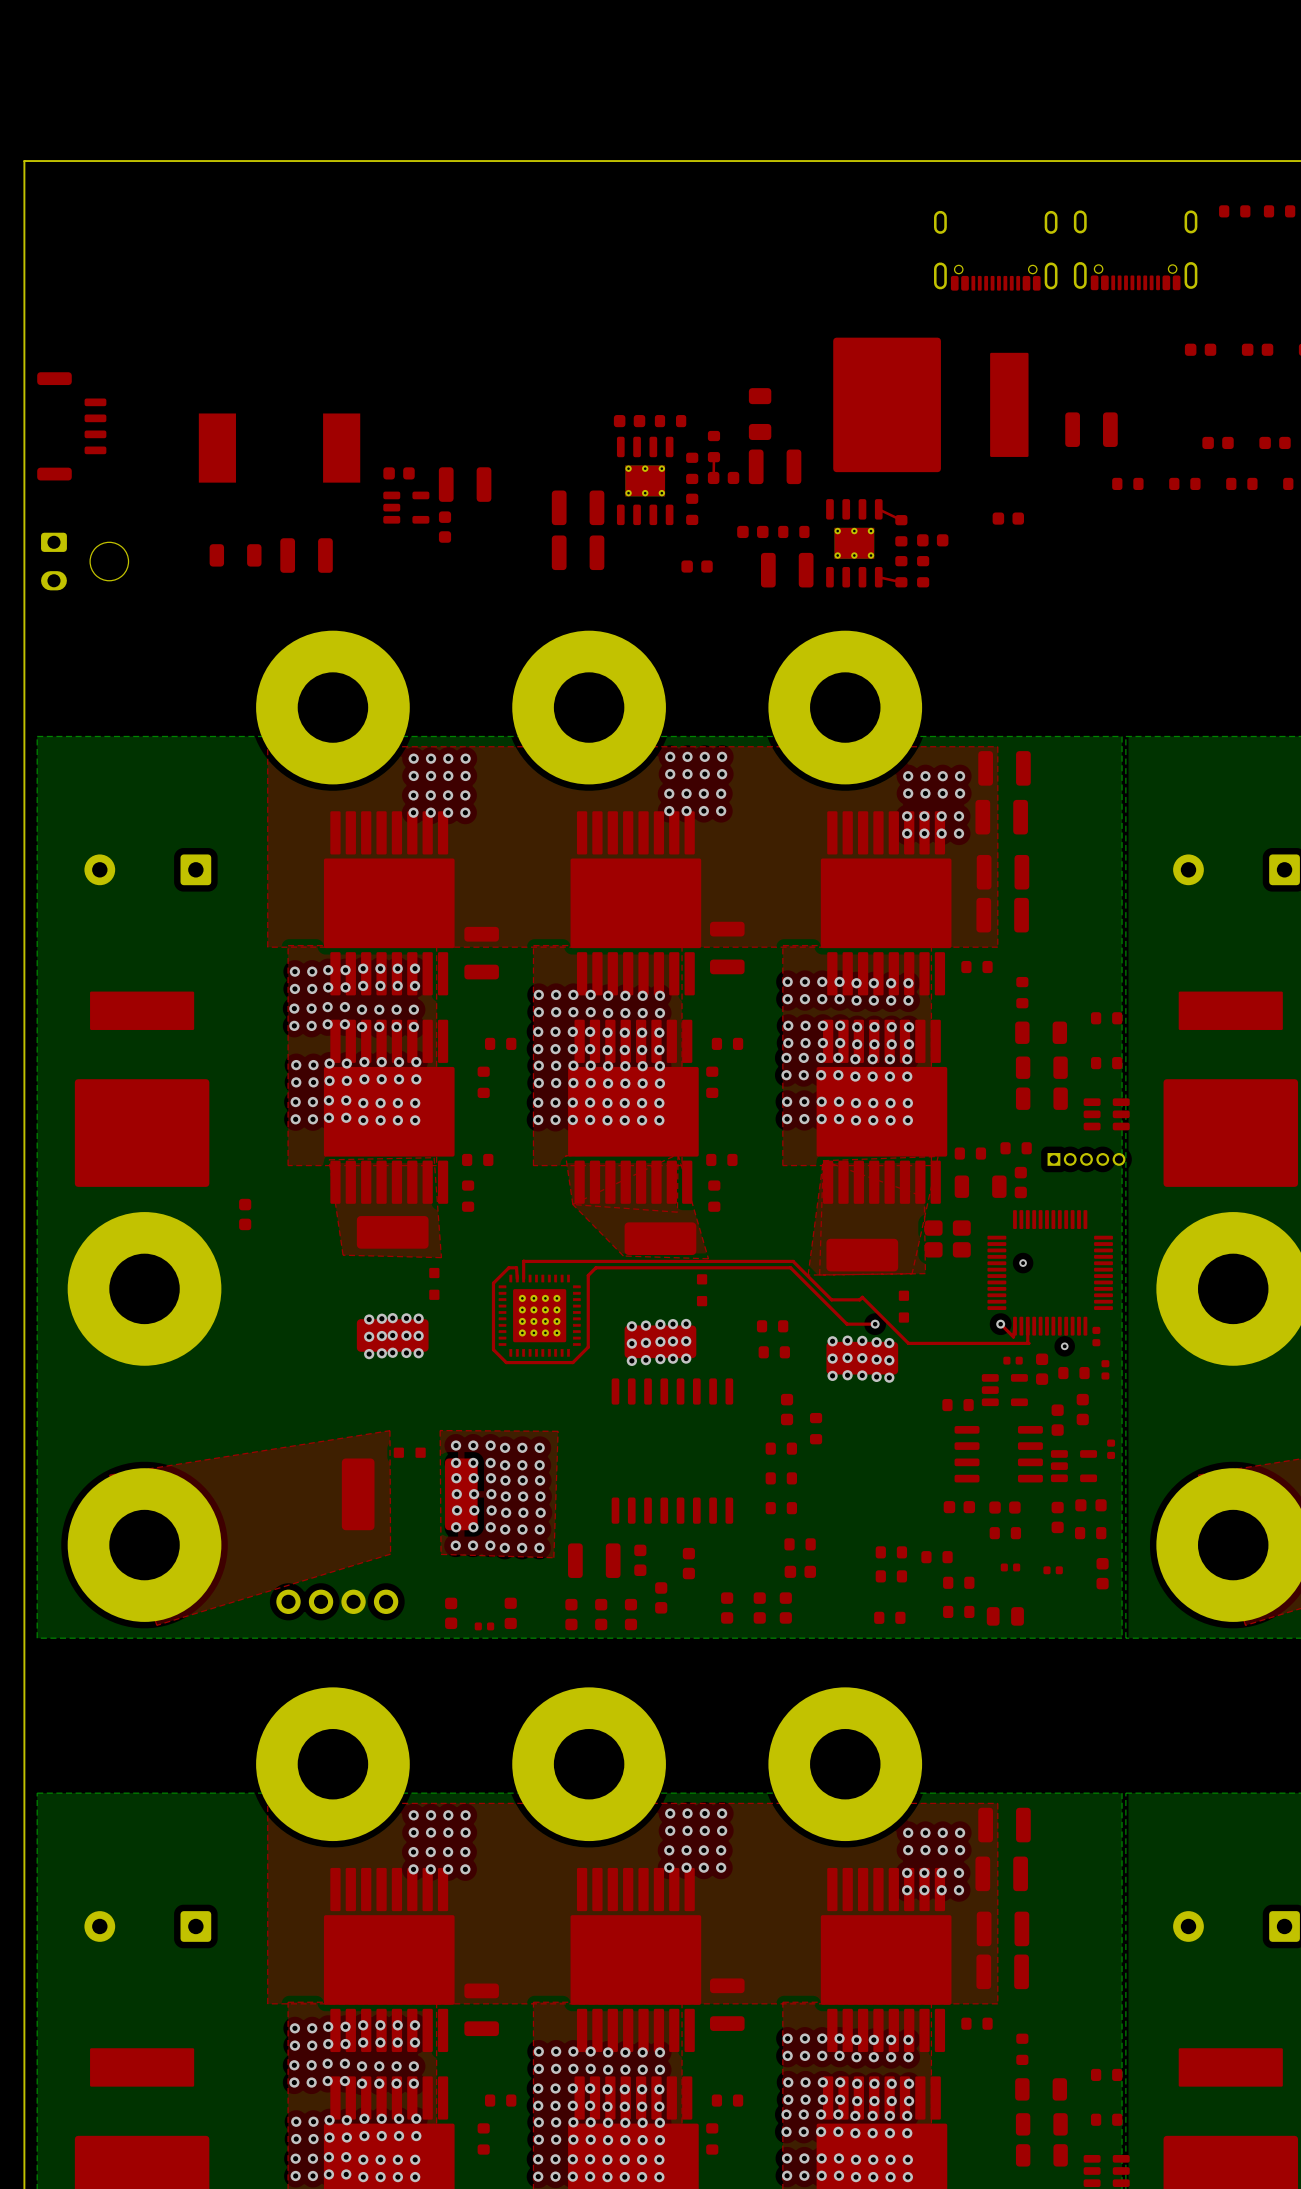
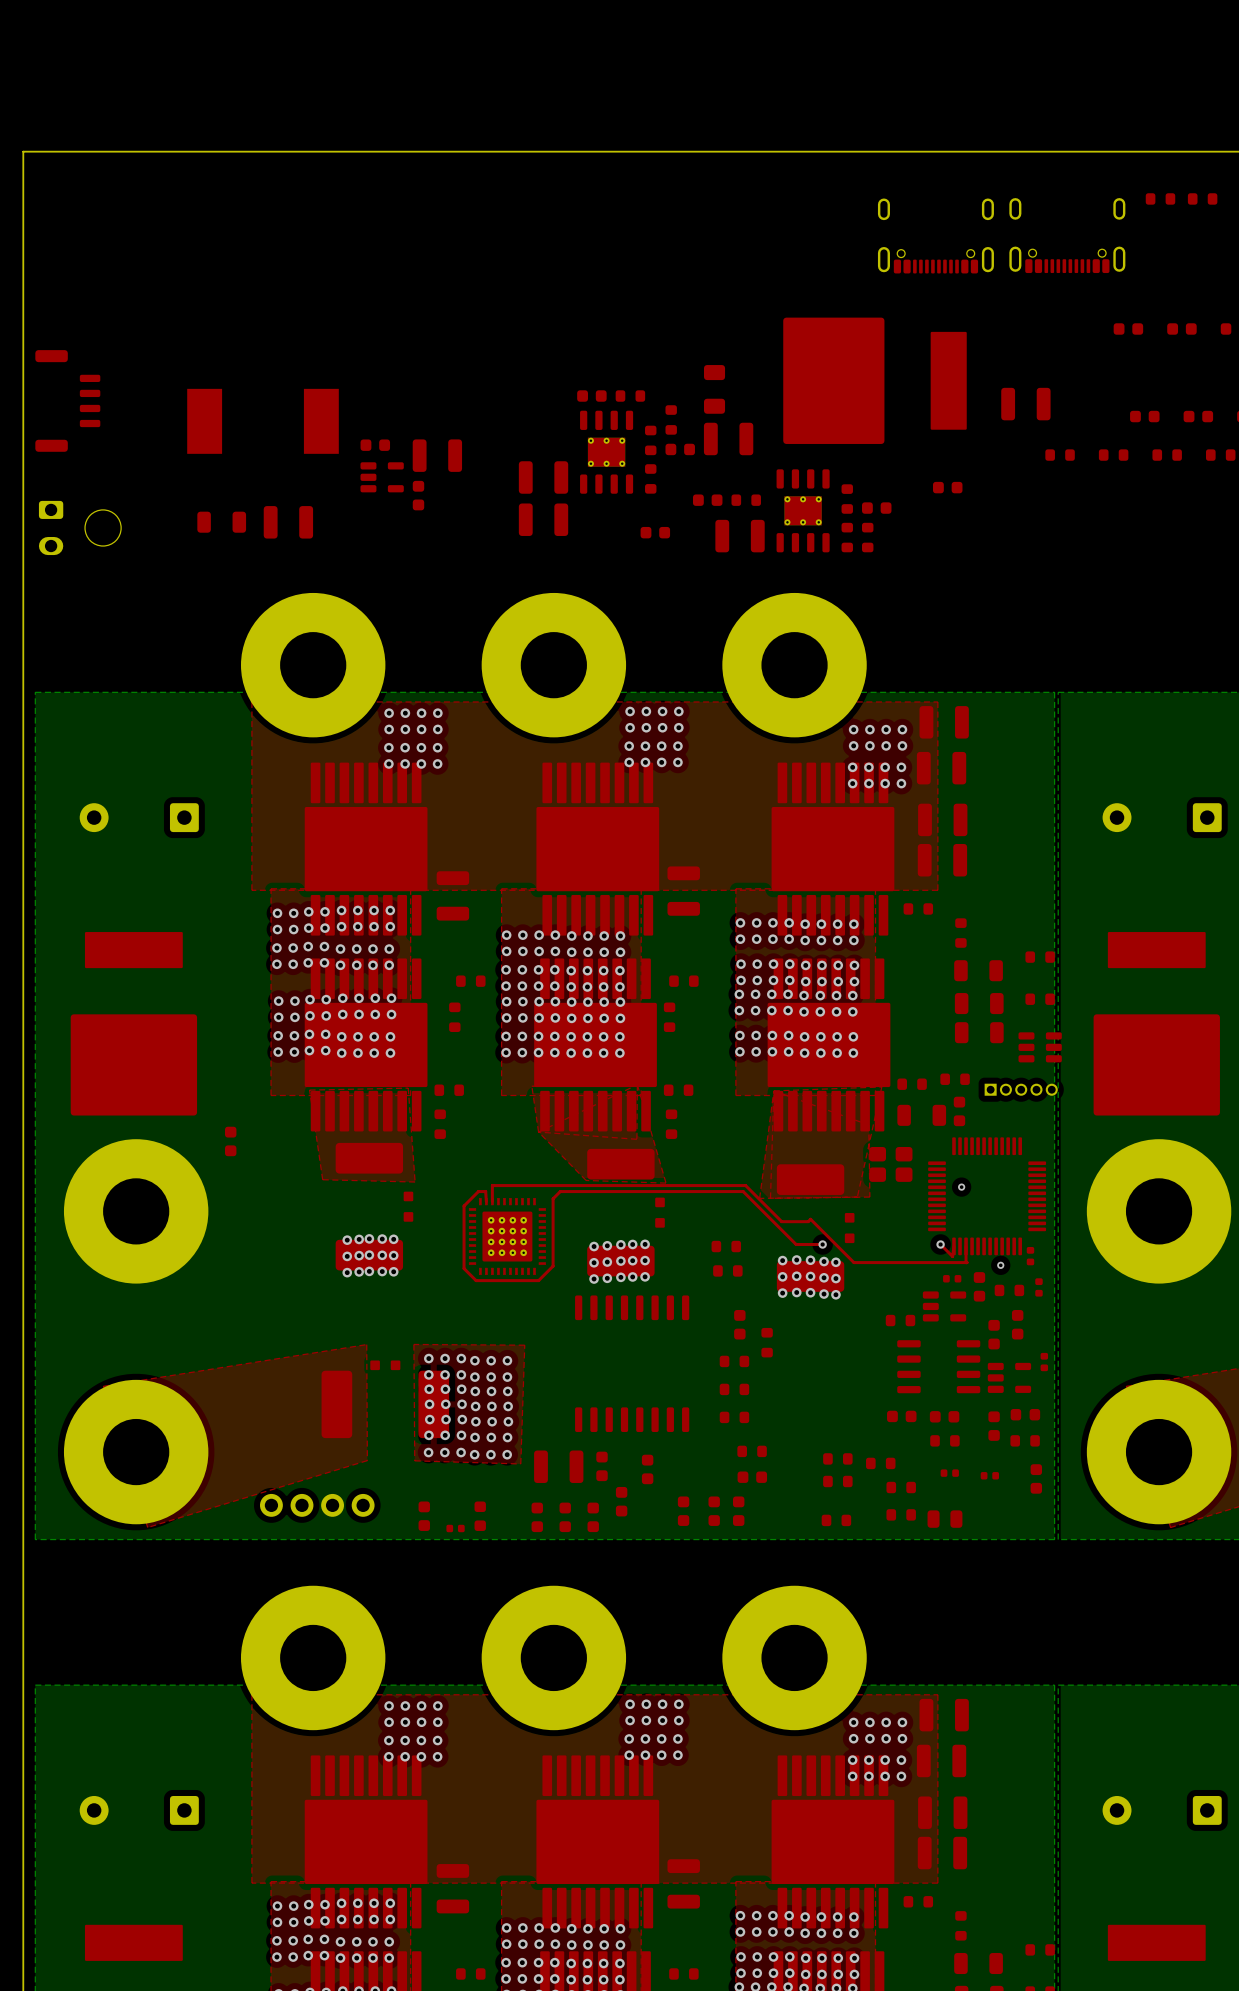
top track: (713, 457) (713, 477) -> none
top track: (878, 509) (901, 520) -> none
top track: (878, 577) (901, 582) -> none

